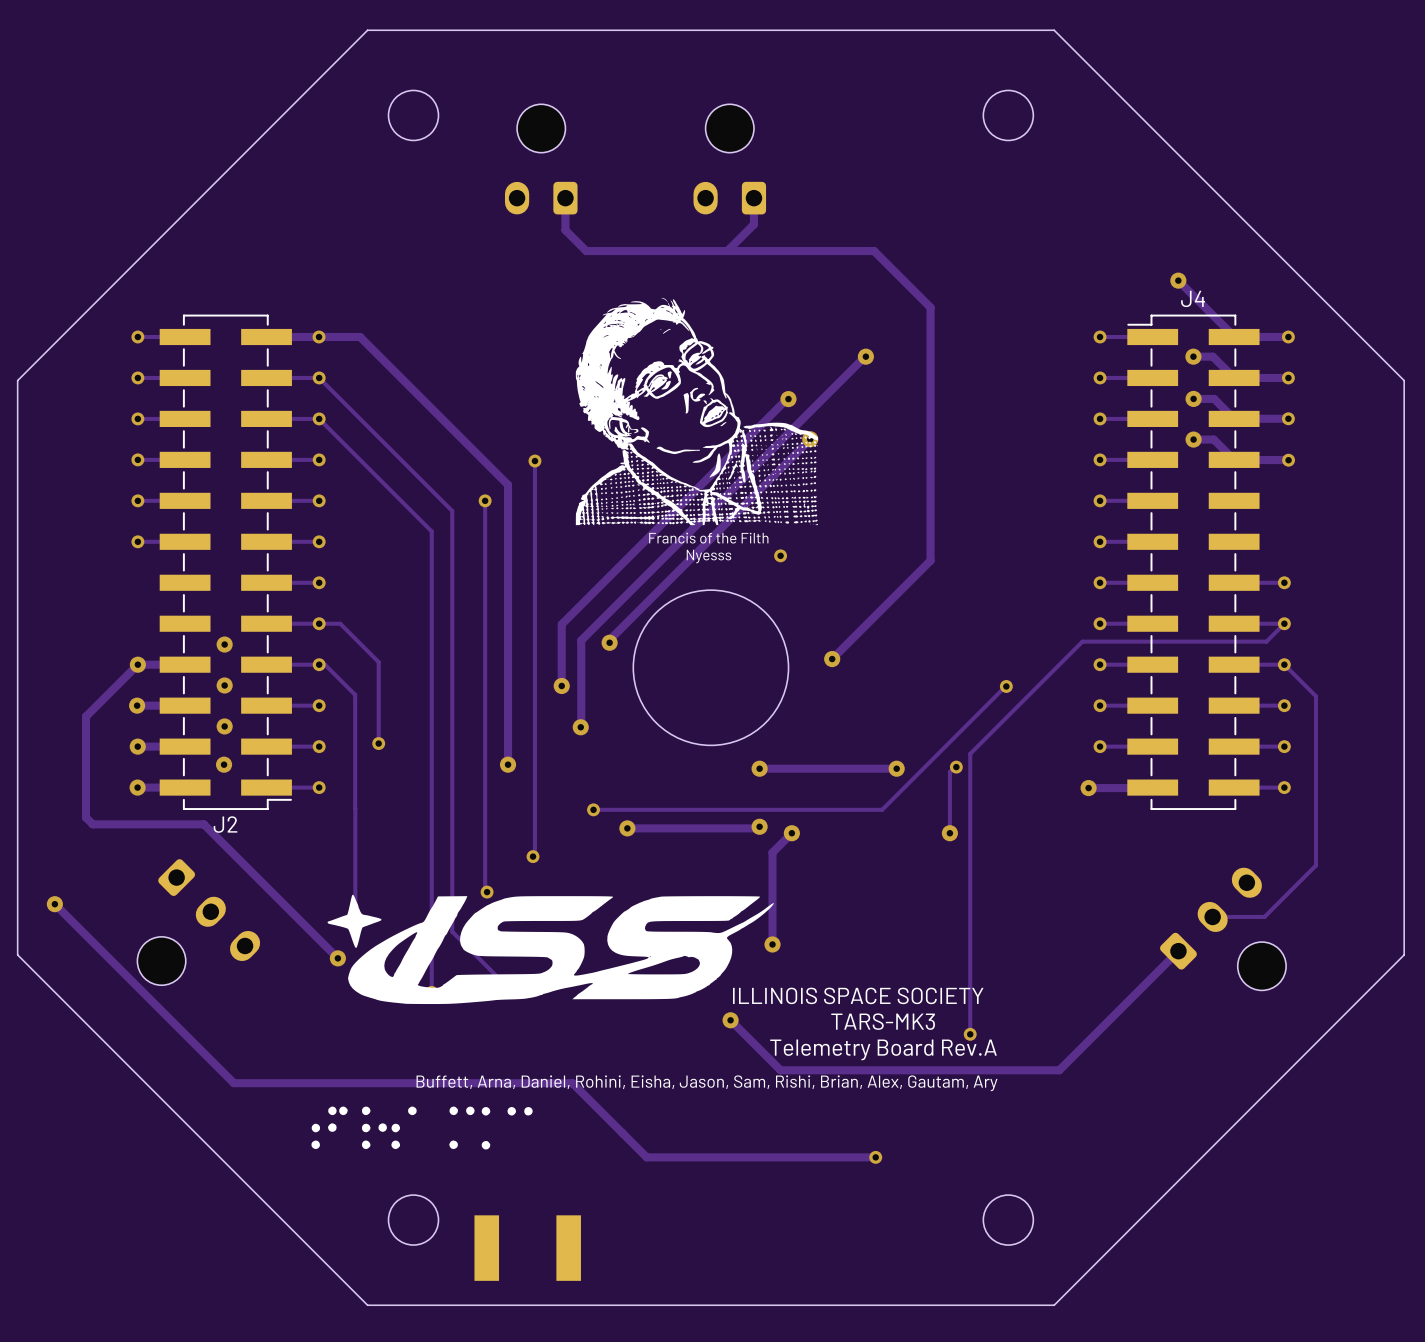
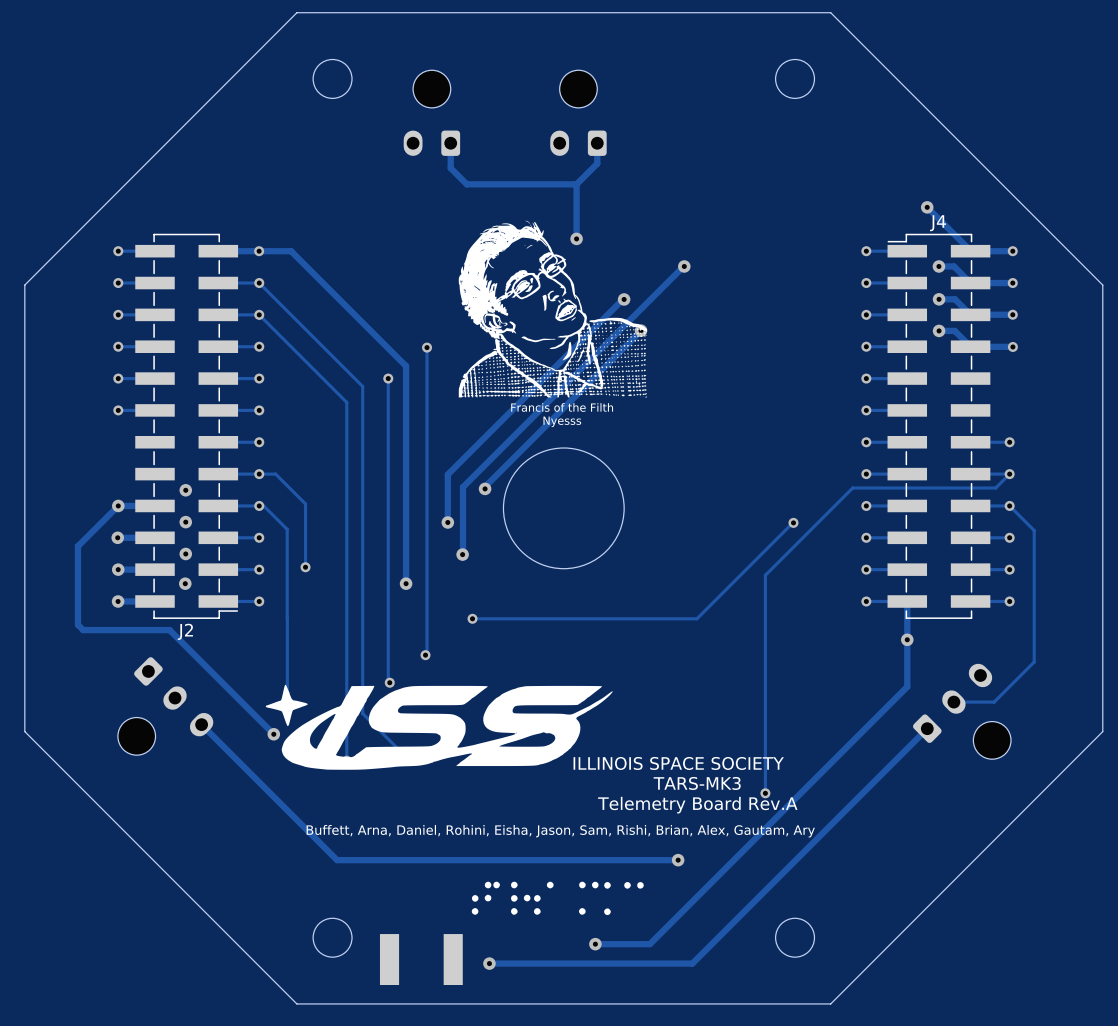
track: (727, 251) (874, 251) (930, 307) (930, 560) (832, 659) -> (576, 184) (576, 238)
via: none -> (576, 238)
via: (780, 555) -> none
via: (832, 659) -> none
track: (956, 767) (949, 771) (949, 833) -> none
via: (956, 767) -> none
via: (759, 768) -> none
track: (896, 768) (759, 768) -> none
via: (896, 768) -> none
track: none -> (866, 601) (907, 601) (907, 686) (649, 944) (595, 944)
via: none -> (866, 601)
track: (1152, 787) (1088, 788) -> none
via position: (1088, 788) -> (907, 639)
track: (759, 826) (758, 828) (627, 828) -> none
via: (759, 826) -> none
via: (627, 828) -> none
track: (791, 833) (772, 852) (772, 944) -> none
via: (791, 833) -> none
via: (949, 833) -> none
track: (54, 904) (233, 1083) (572, 1083) (646, 1157) (875, 1157) -> none
via: (54, 904) -> none
via: (772, 944) -> none
track: none -> (201, 724) (337, 860) (678, 860)
track: (730, 1020) (780, 1070) (1059, 1070) -> (489, 963) (692, 963) (834, 821)
via: (730, 1020) -> none
via: none -> (678, 860)
drawing position: (422, 1128) -> (557, 898)
via: (875, 1157) -> none
via: none -> (595, 944)
via: none -> (489, 963)

